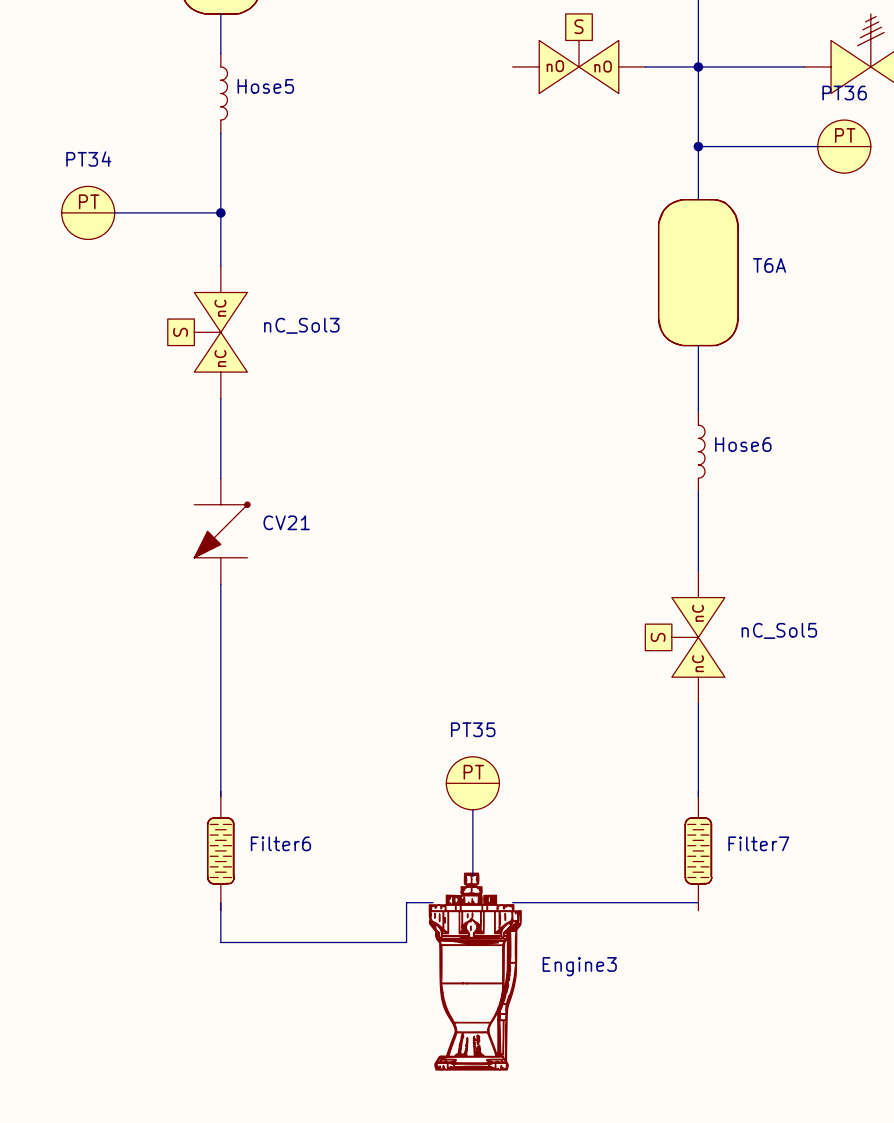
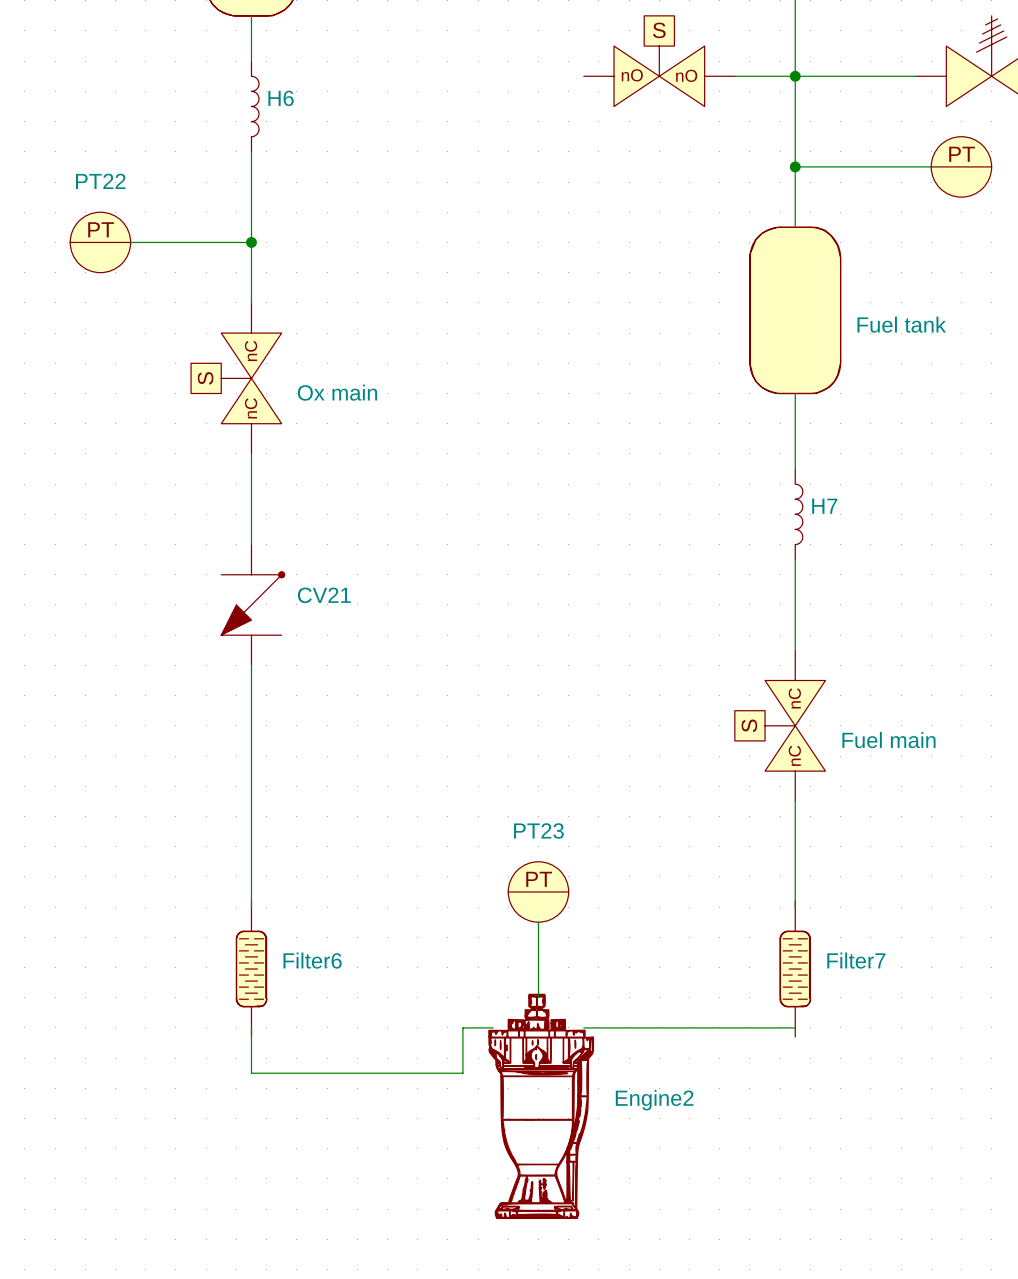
Hose5 name: Hose5 (265, 86) -> H6 (281, 98)
PT36 name: PT36 (844, 93) -> none
PT34 name: PT34 (88, 159) -> PT22 (100, 181)
T6A name: T6A (769, 265) -> none
T6A value: none -> Fuel tank (901, 324)
nC_Sol3 name: nC_Sol3 (301, 325) -> none
nC_Sol3 value: none -> Ox main (337, 392)
Hose6 name: Hose6 (743, 444) -> H7 (824, 506)
nC_Sol5 name: nC_Sol5 (779, 630) -> none
nC_Sol5 value: none -> Fuel main (888, 740)
PT35 name: PT35 (473, 729) -> PT23 (538, 830)
Engine3 name: Engine3 (579, 966) -> Engine2 (654, 1100)

